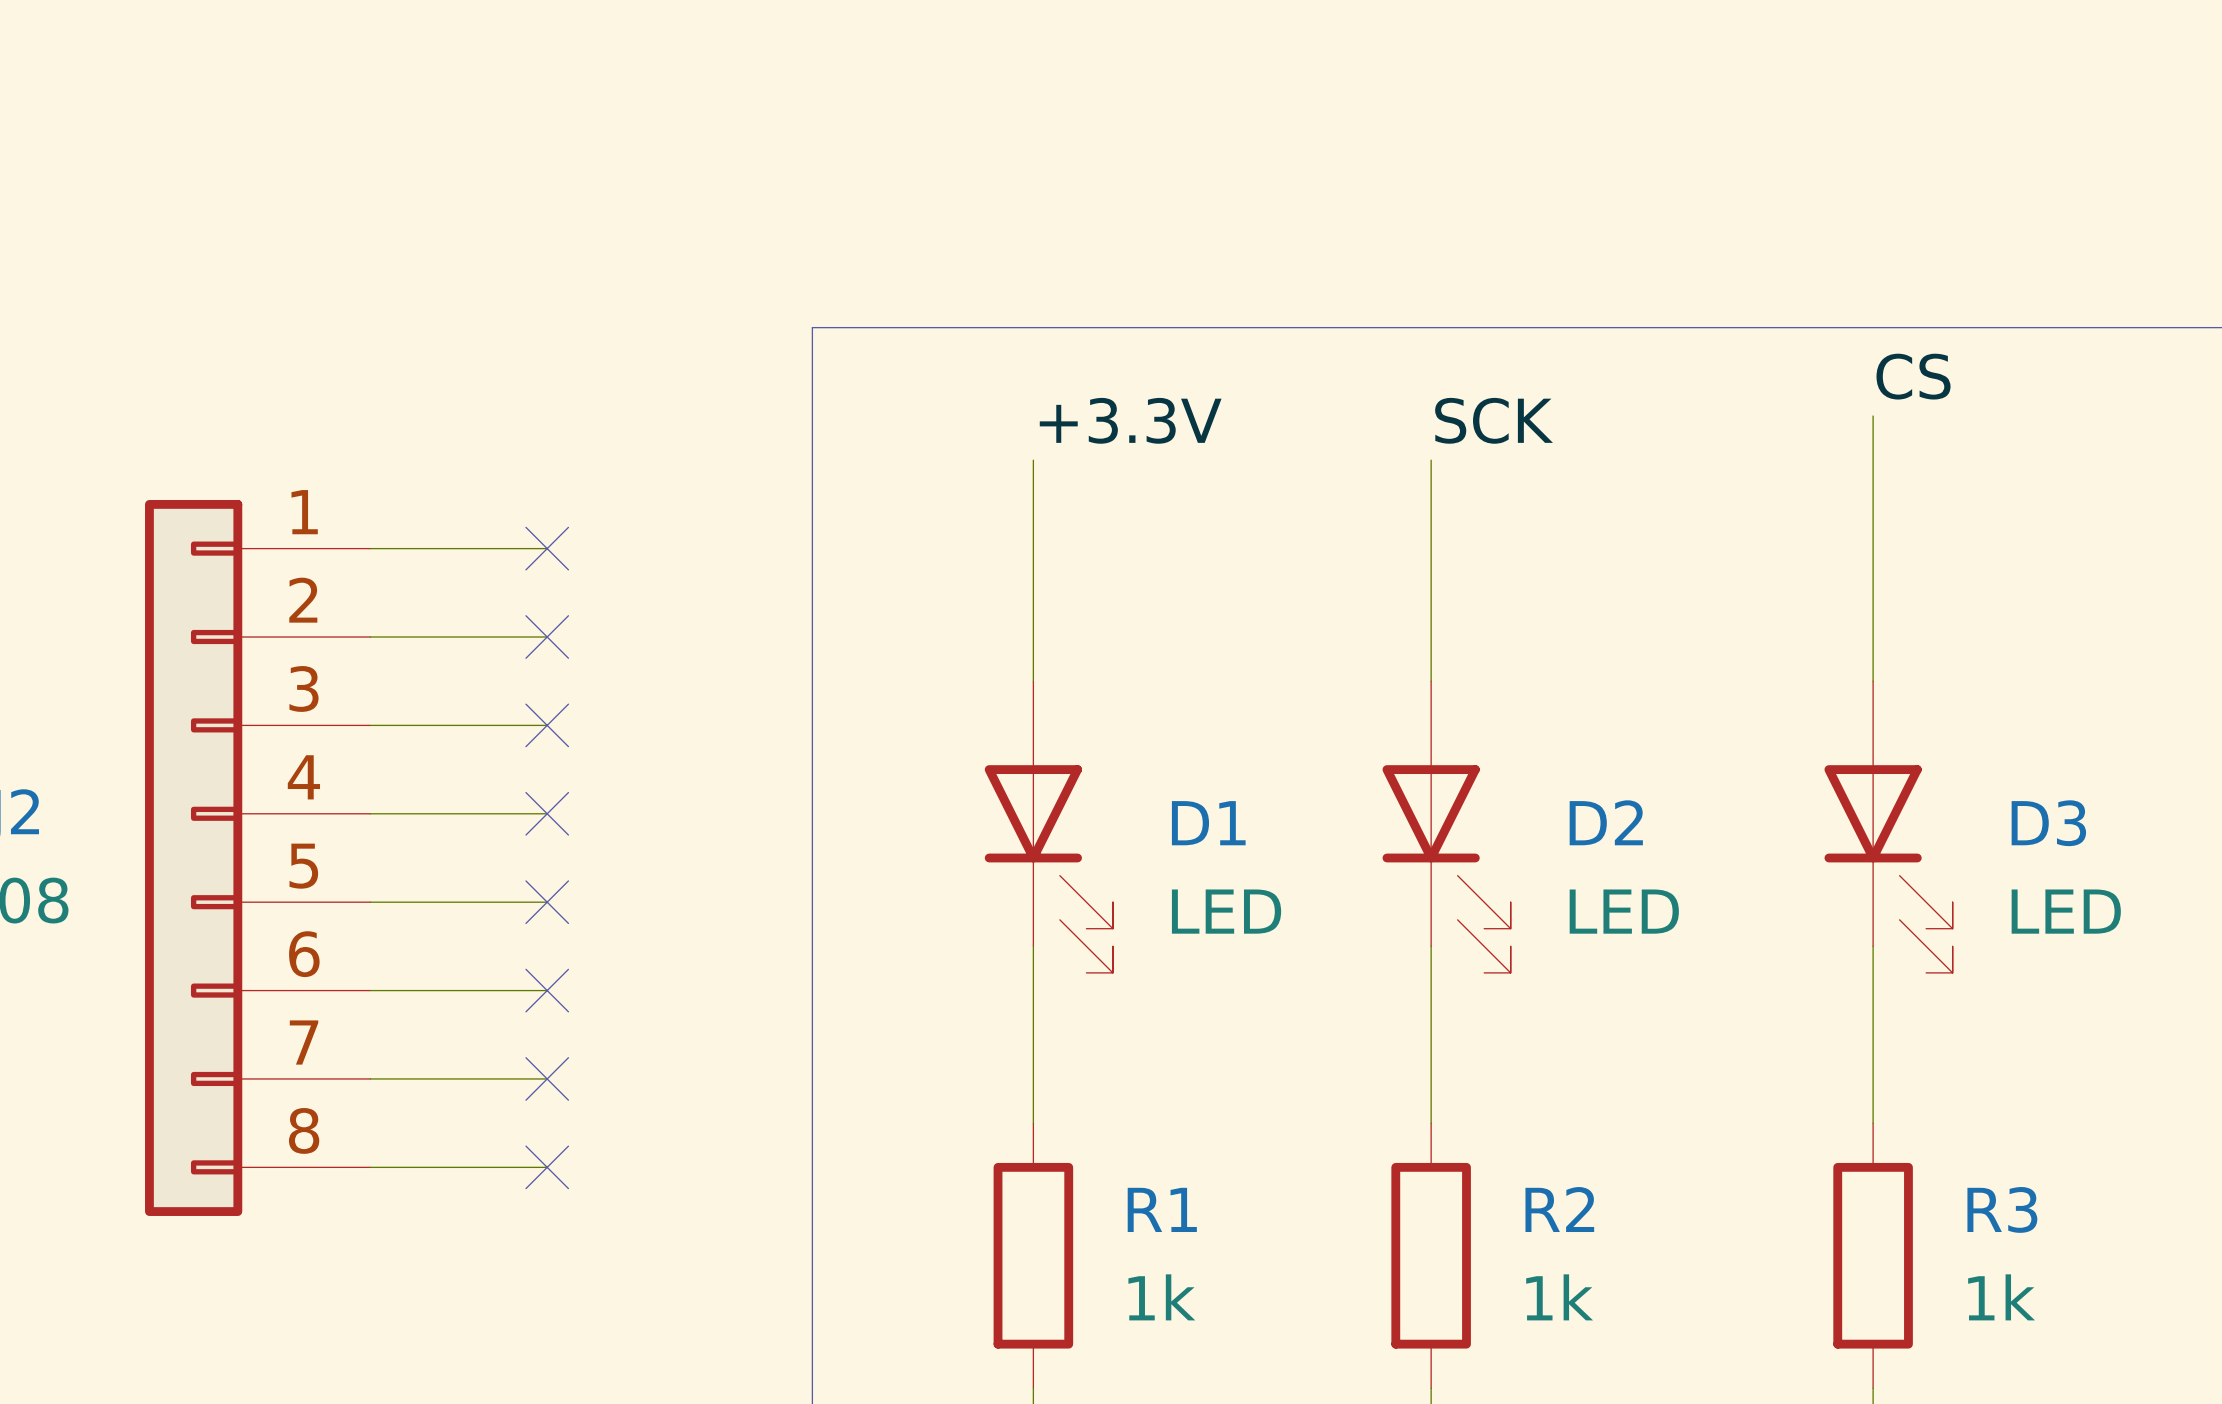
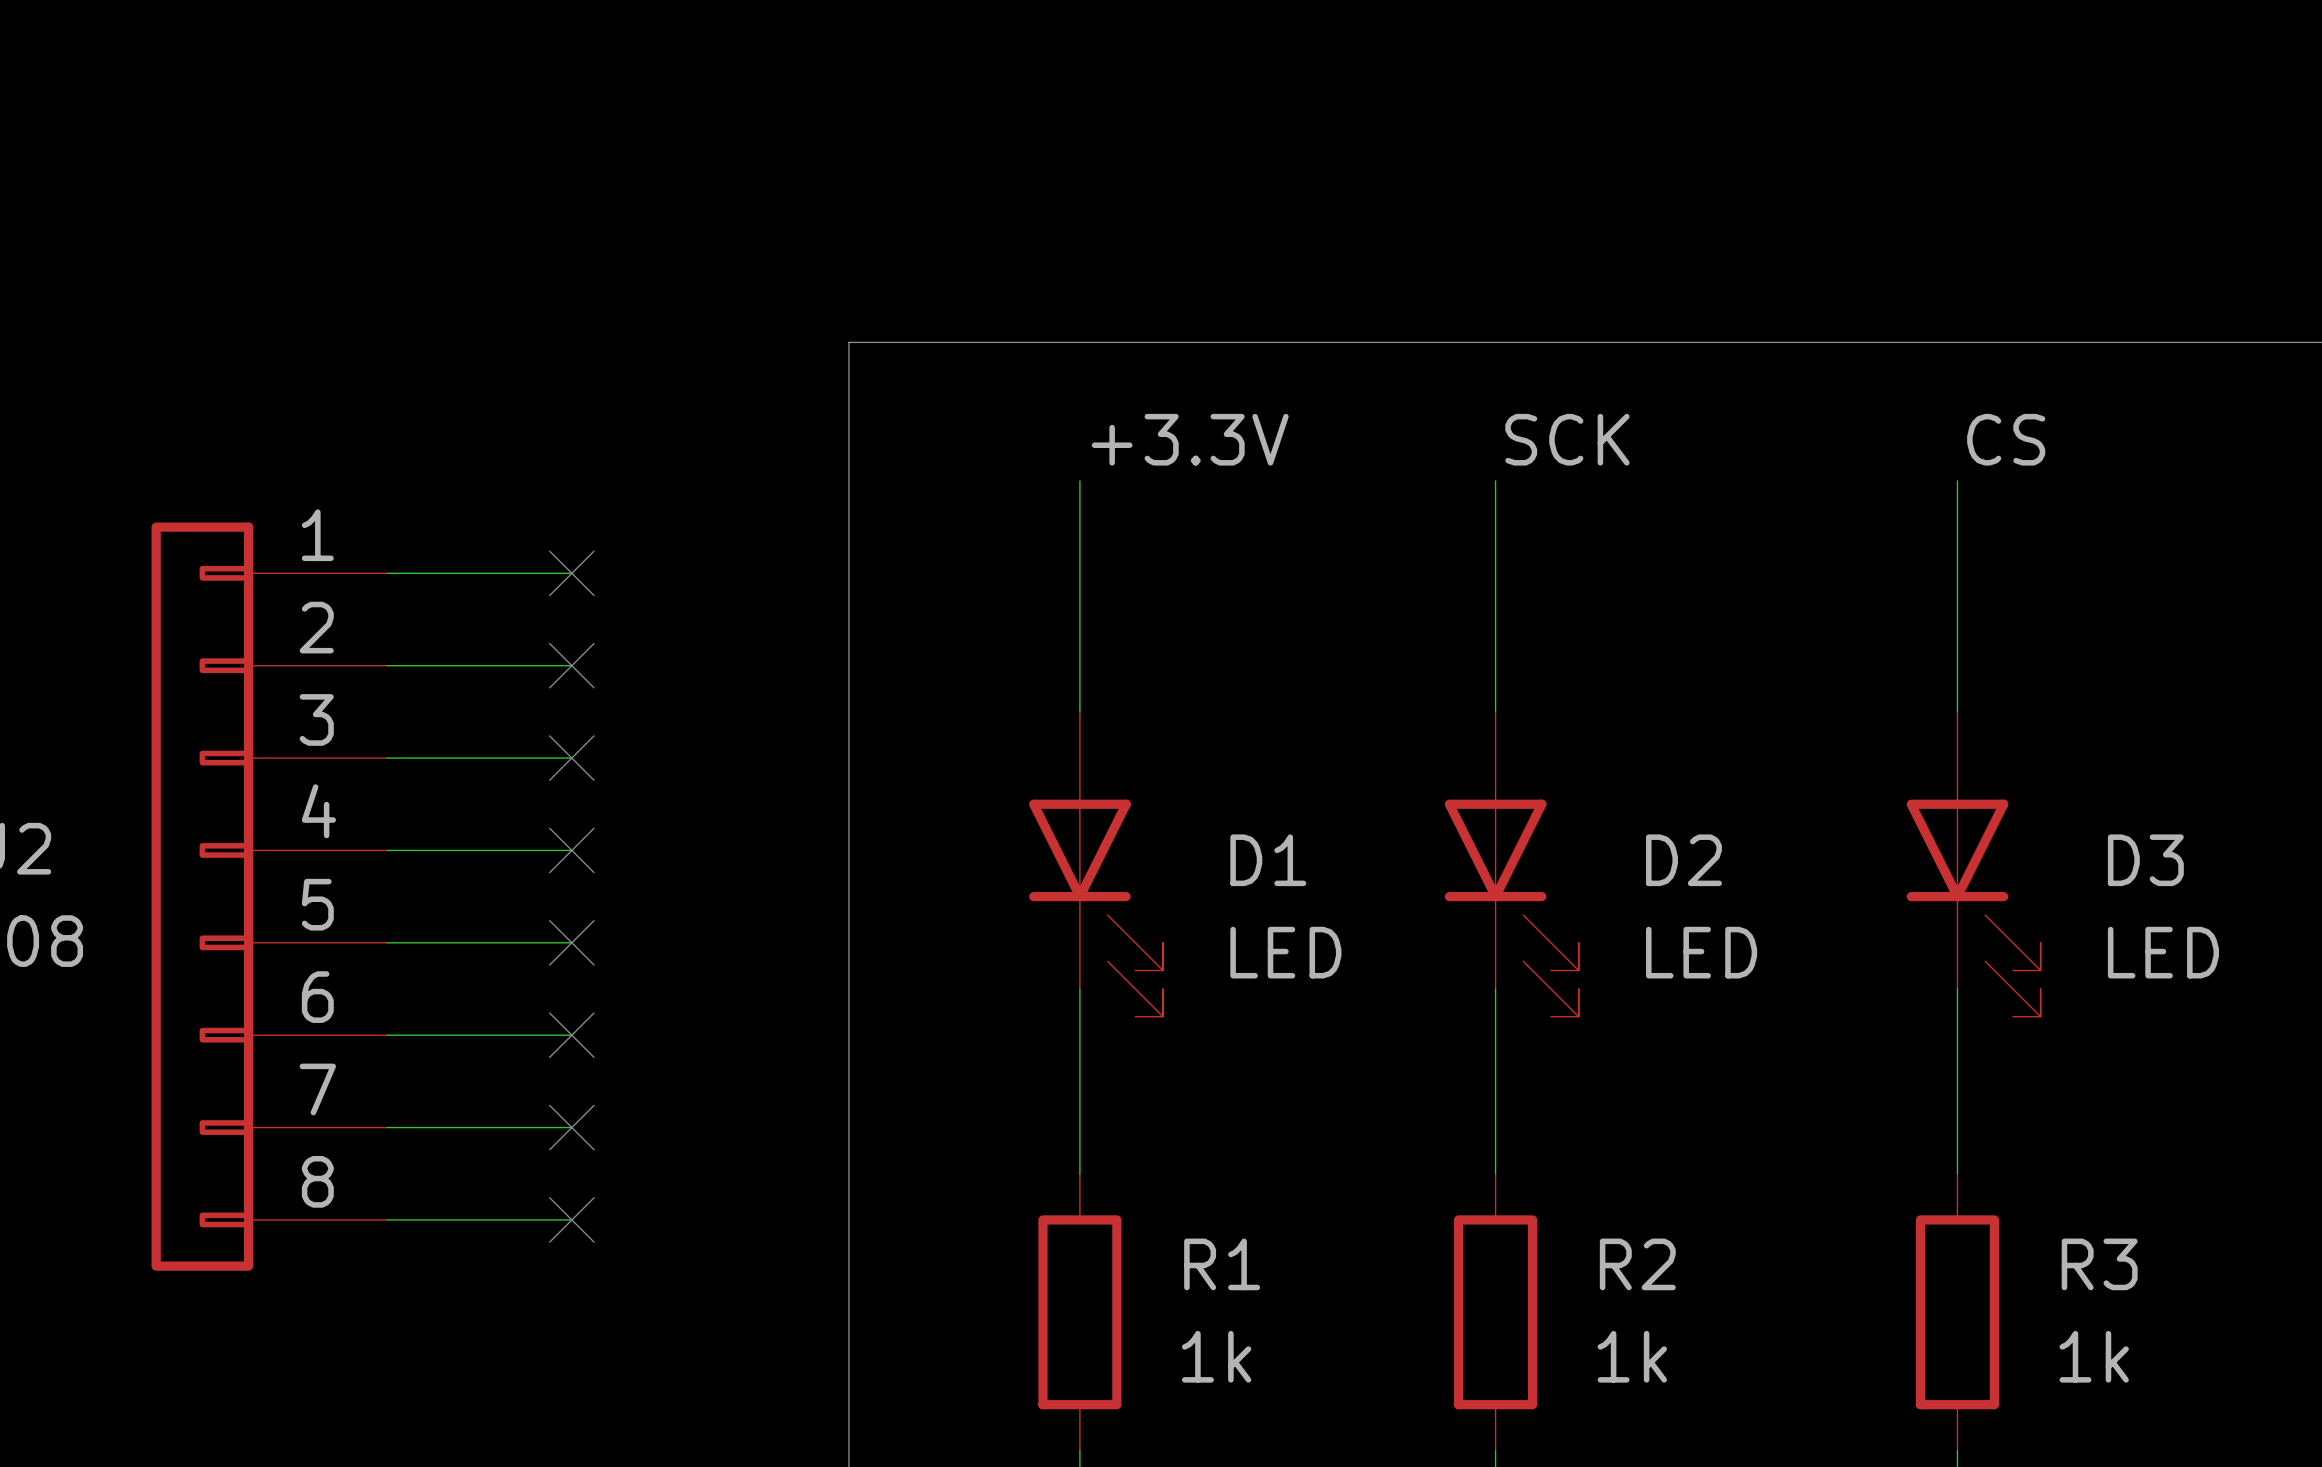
label position: CS (1913, 376) -> CS (2006, 439)
wire: (1873, 416) (1873, 460) -> none

